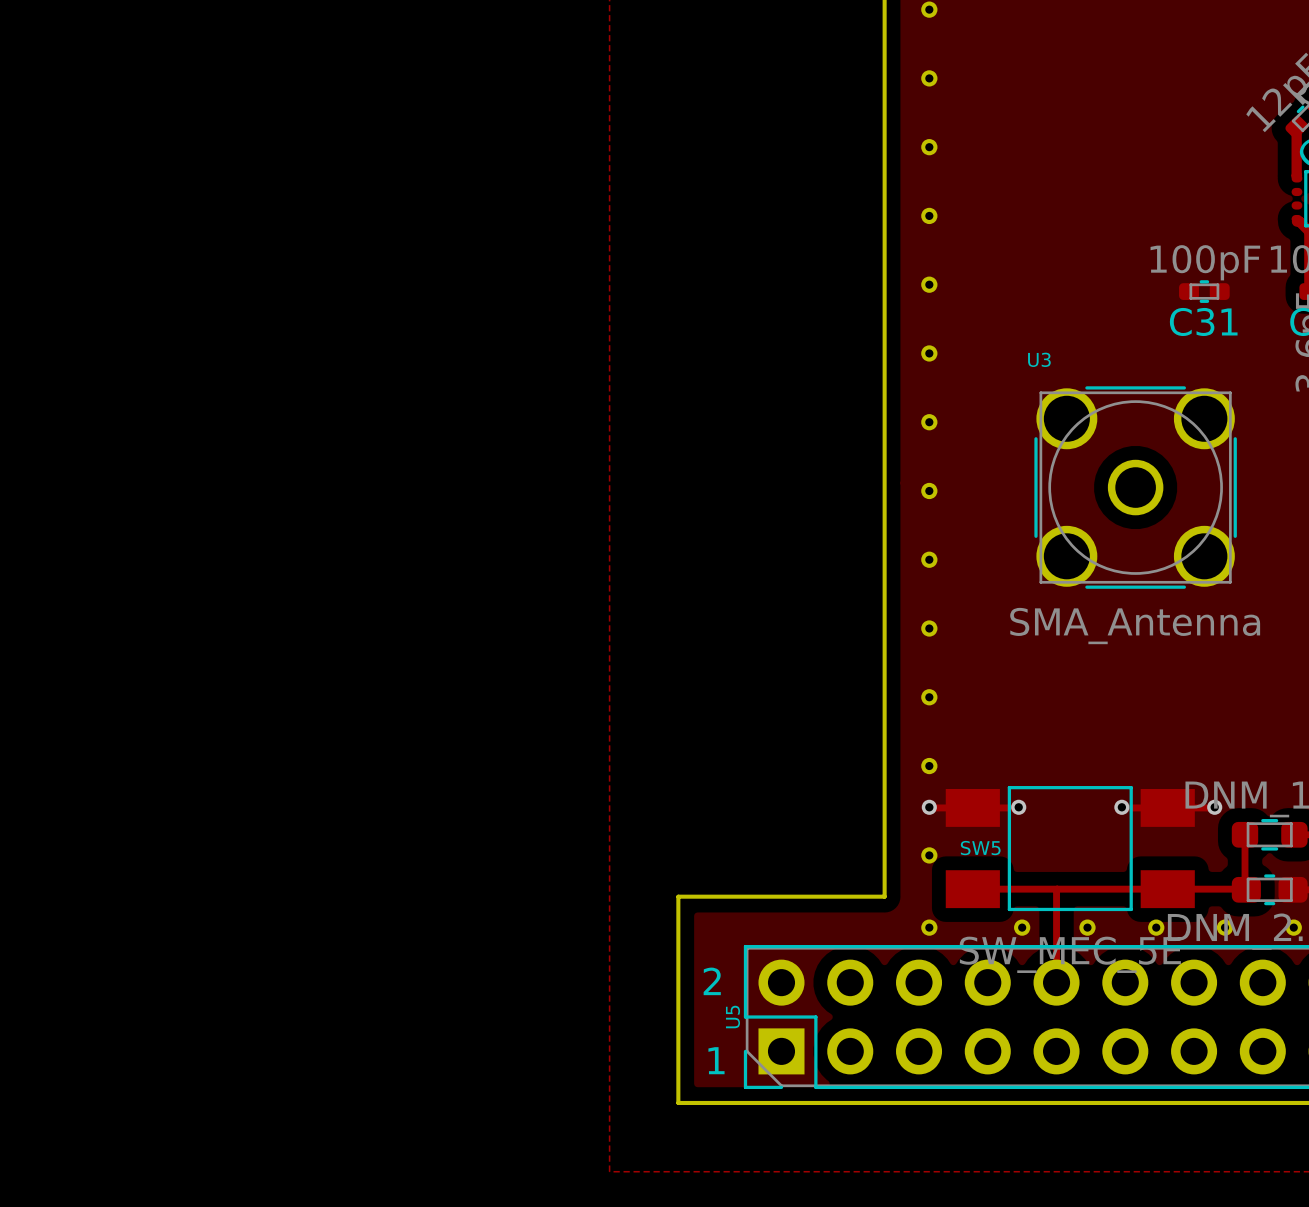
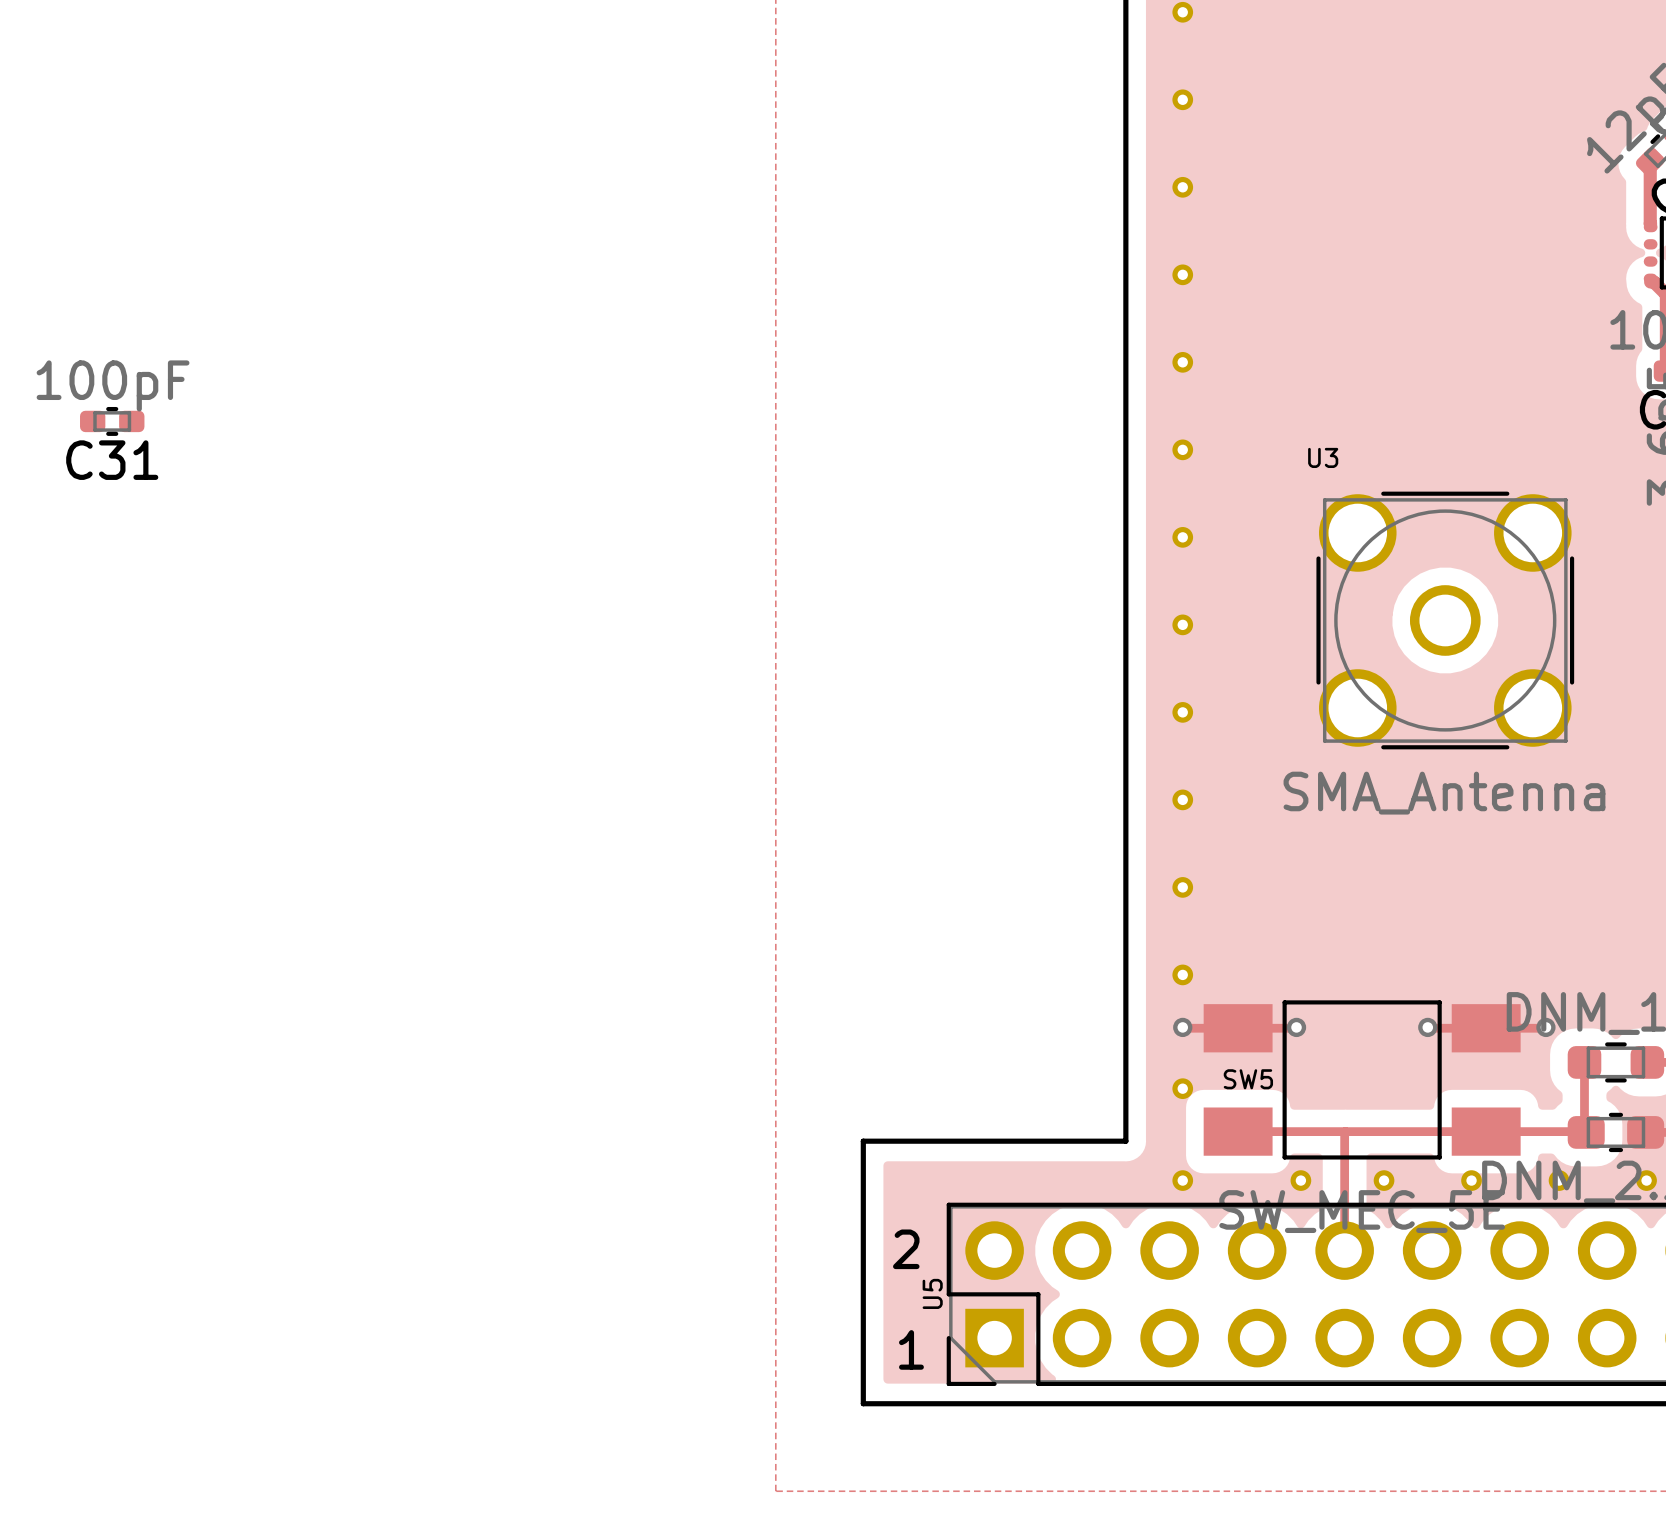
C31 position: (1204, 291) -> (112, 421)

